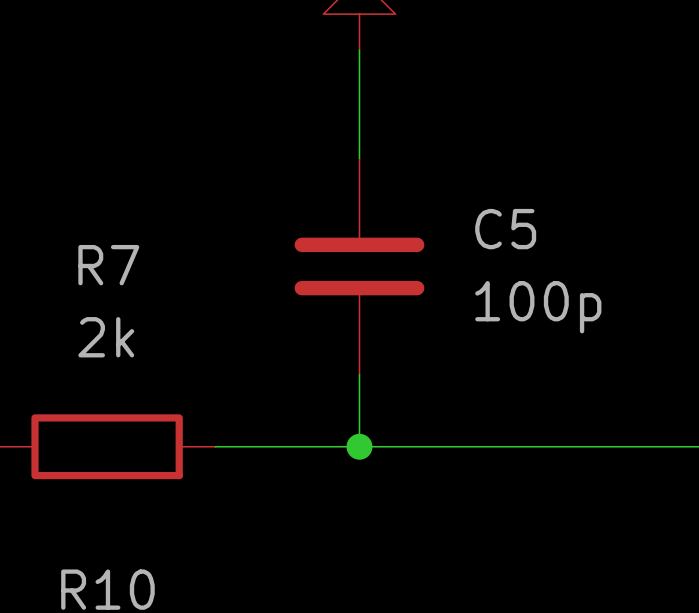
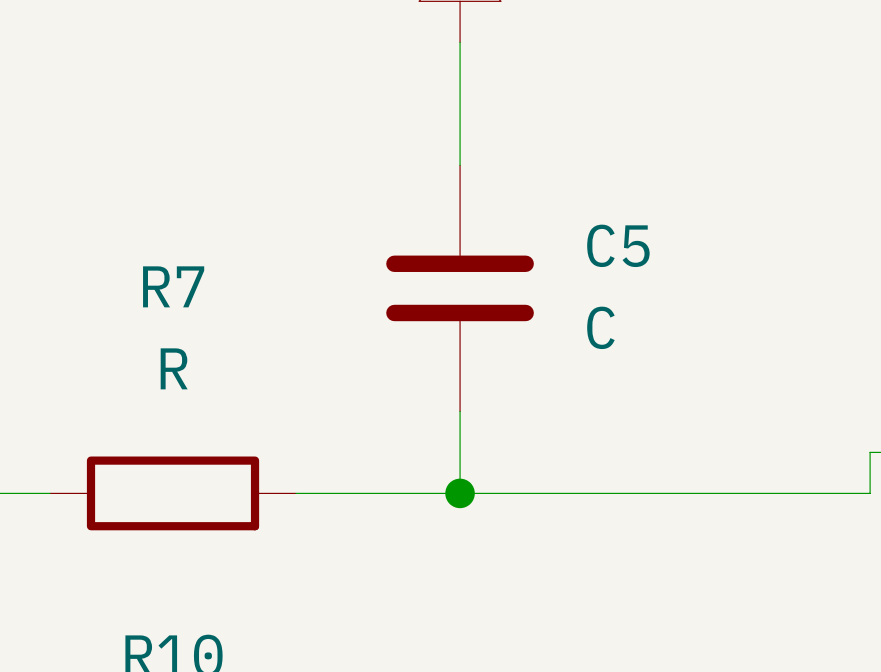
C5 value: 100p (538, 307) -> C (600, 327)
R7 value: 2k (106, 337) -> R (174, 368)

